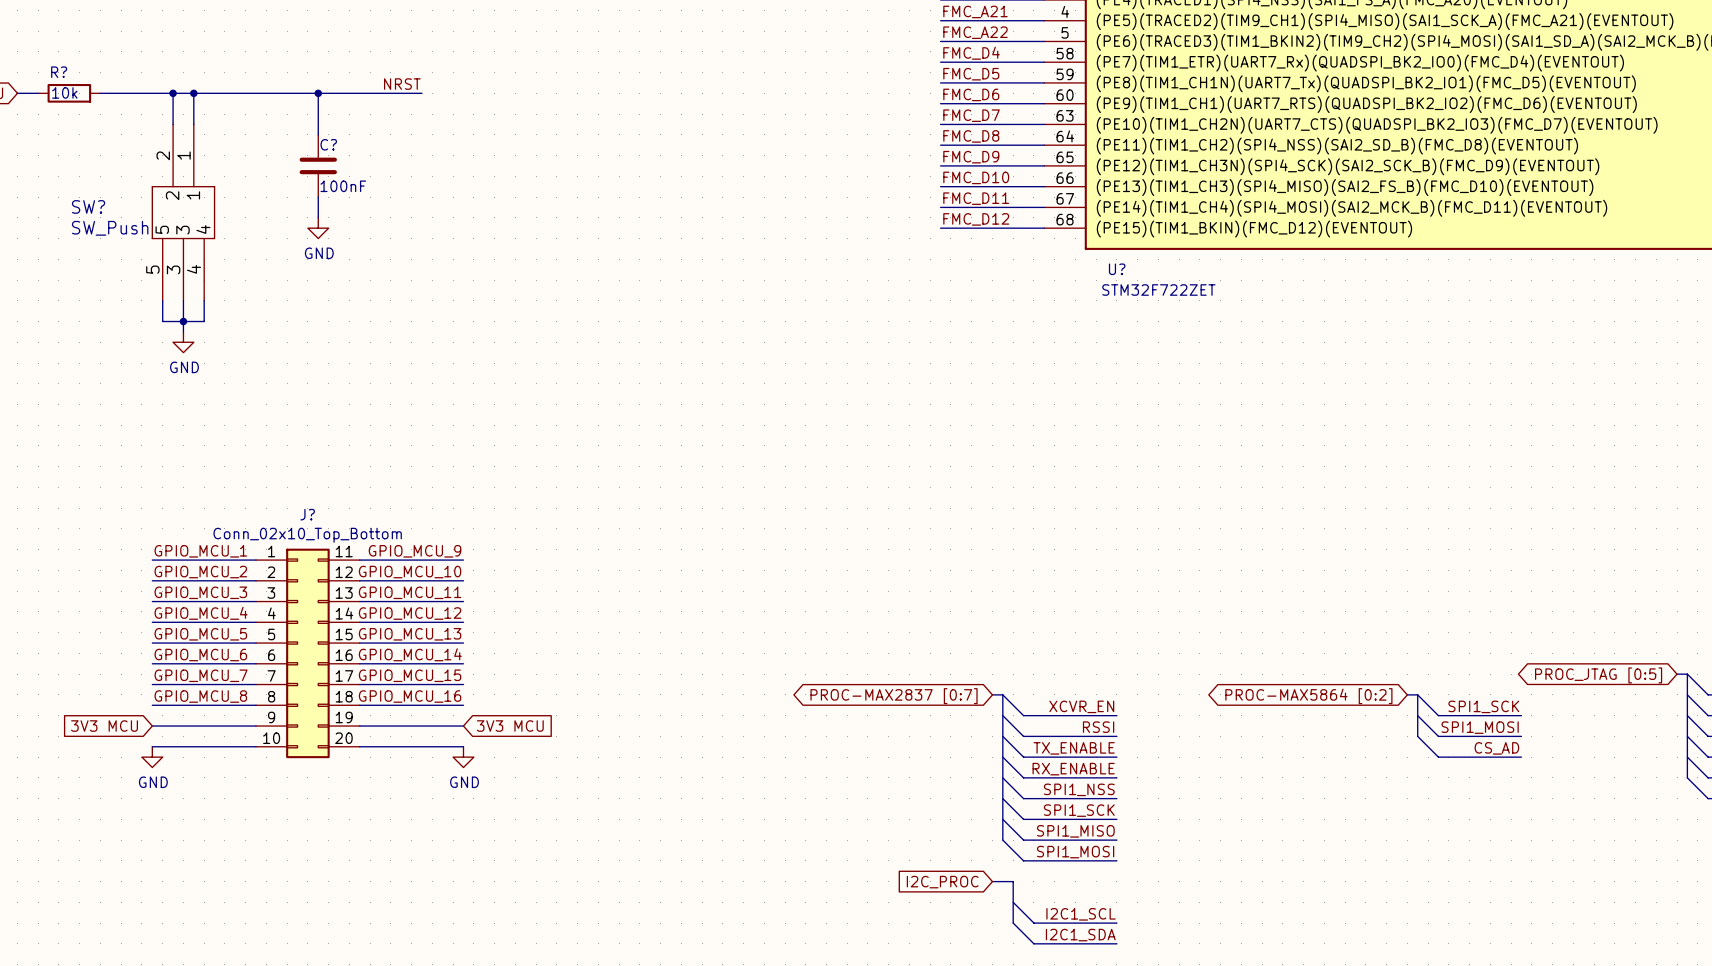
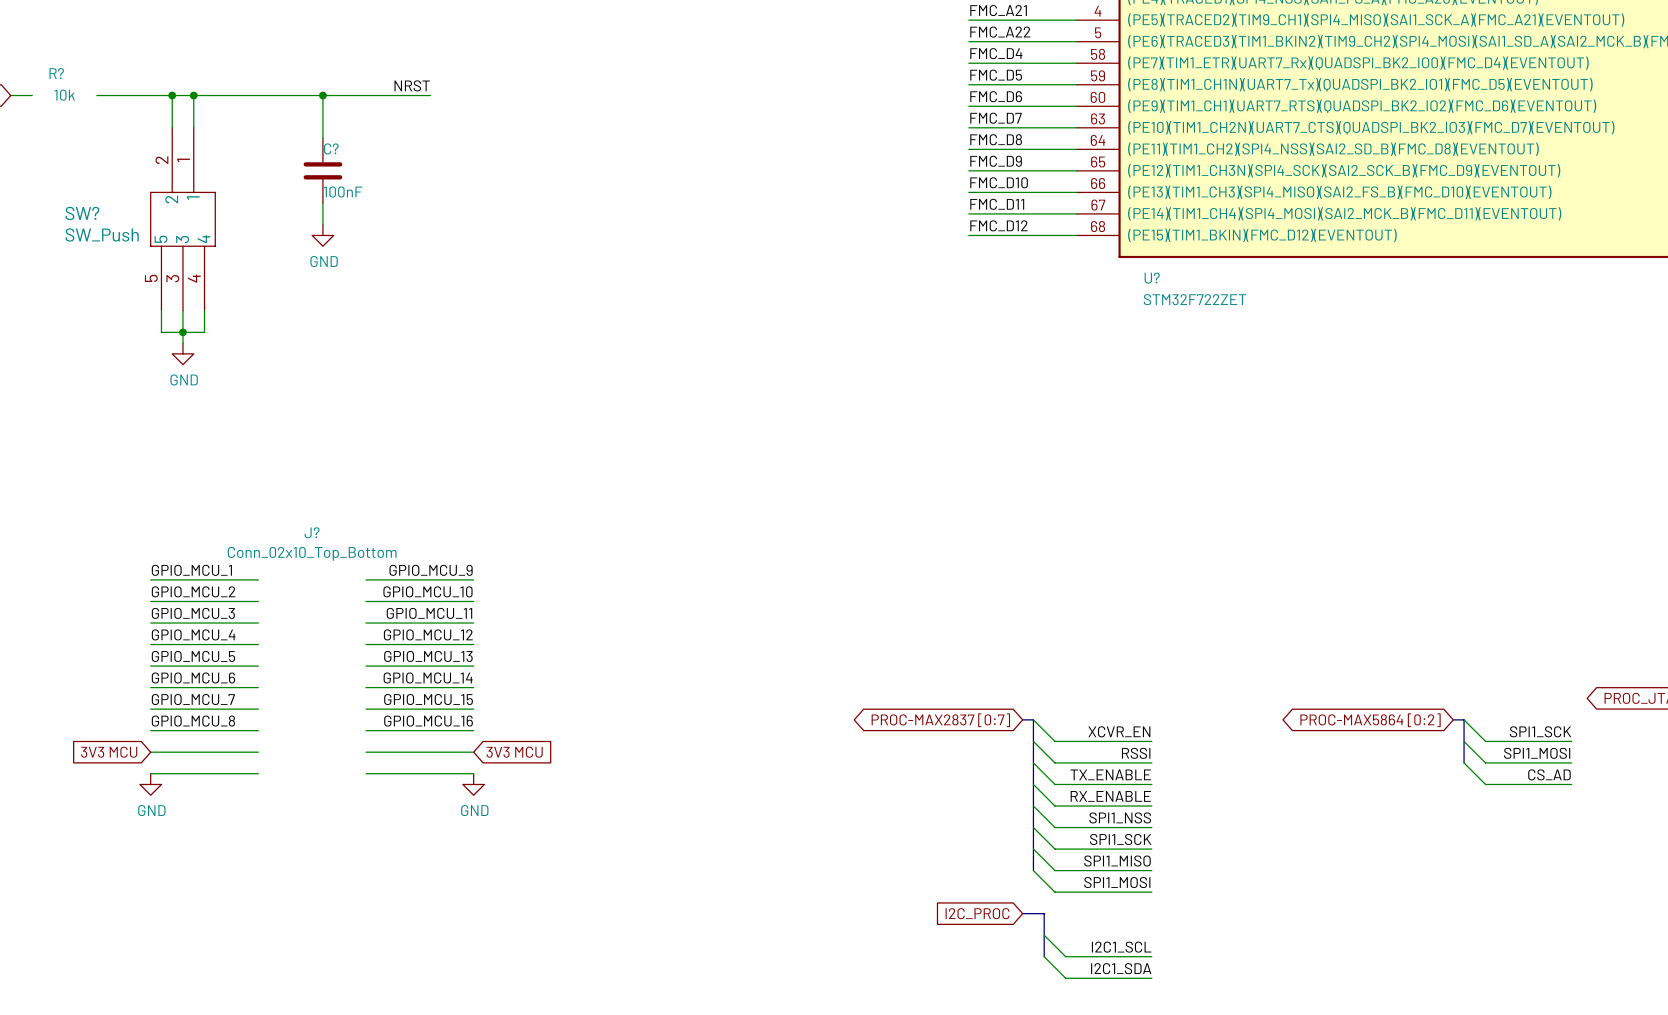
R?: none -> 10k (62, 84)
R?: 10k (69, 93) -> none
J?: Conn_02x10_Top_Bottom (307, 653) -> none

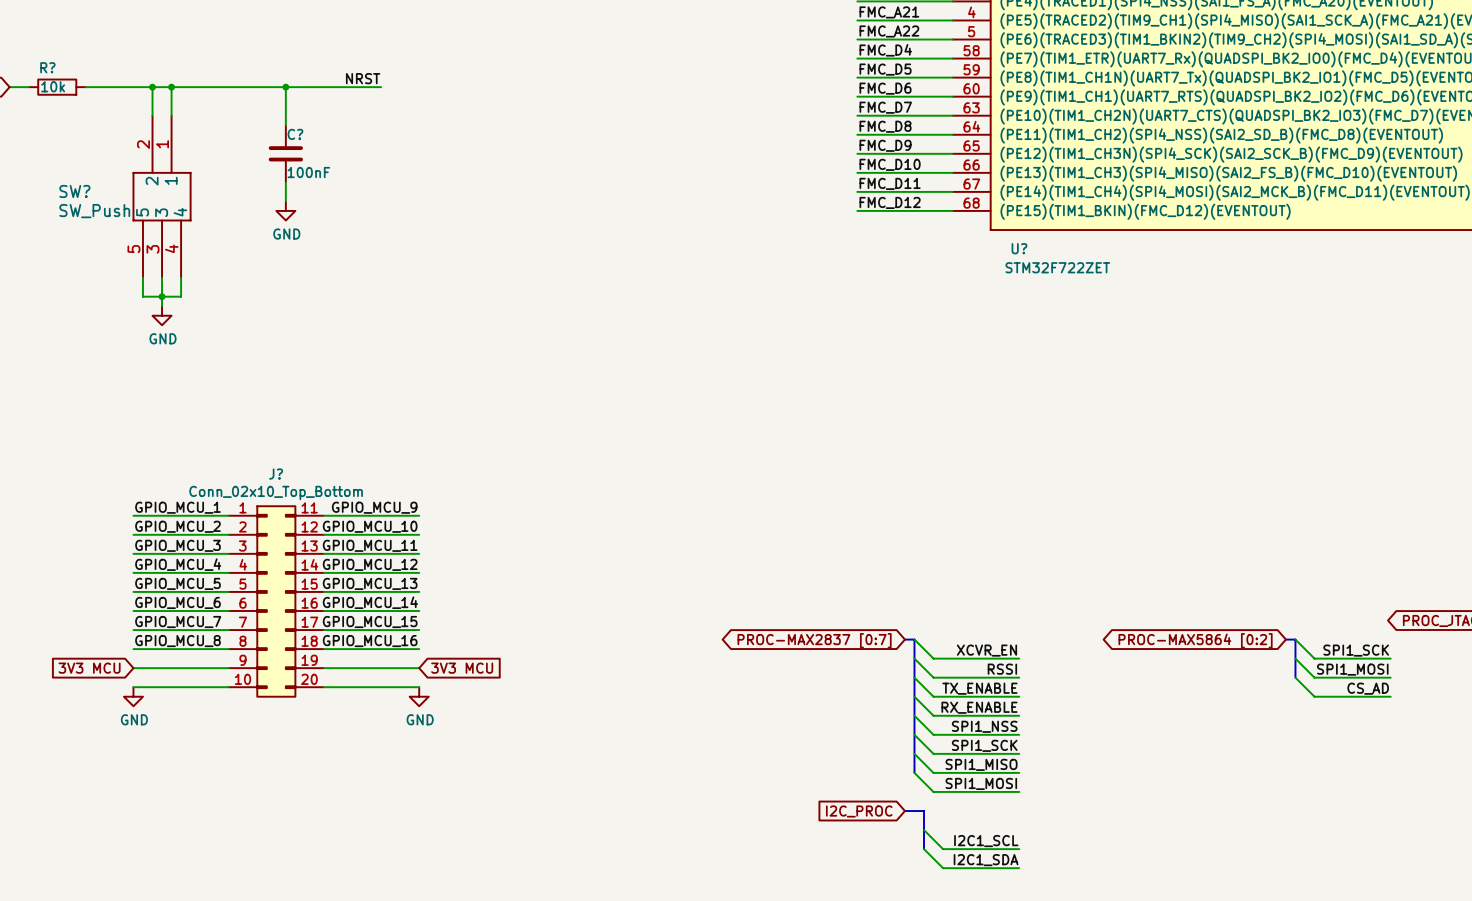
R?: 10k (62, 84) -> none
R?: none -> 10k (57, 87)
J?: none -> Conn_02x10_Top_Bottom (276, 601)

